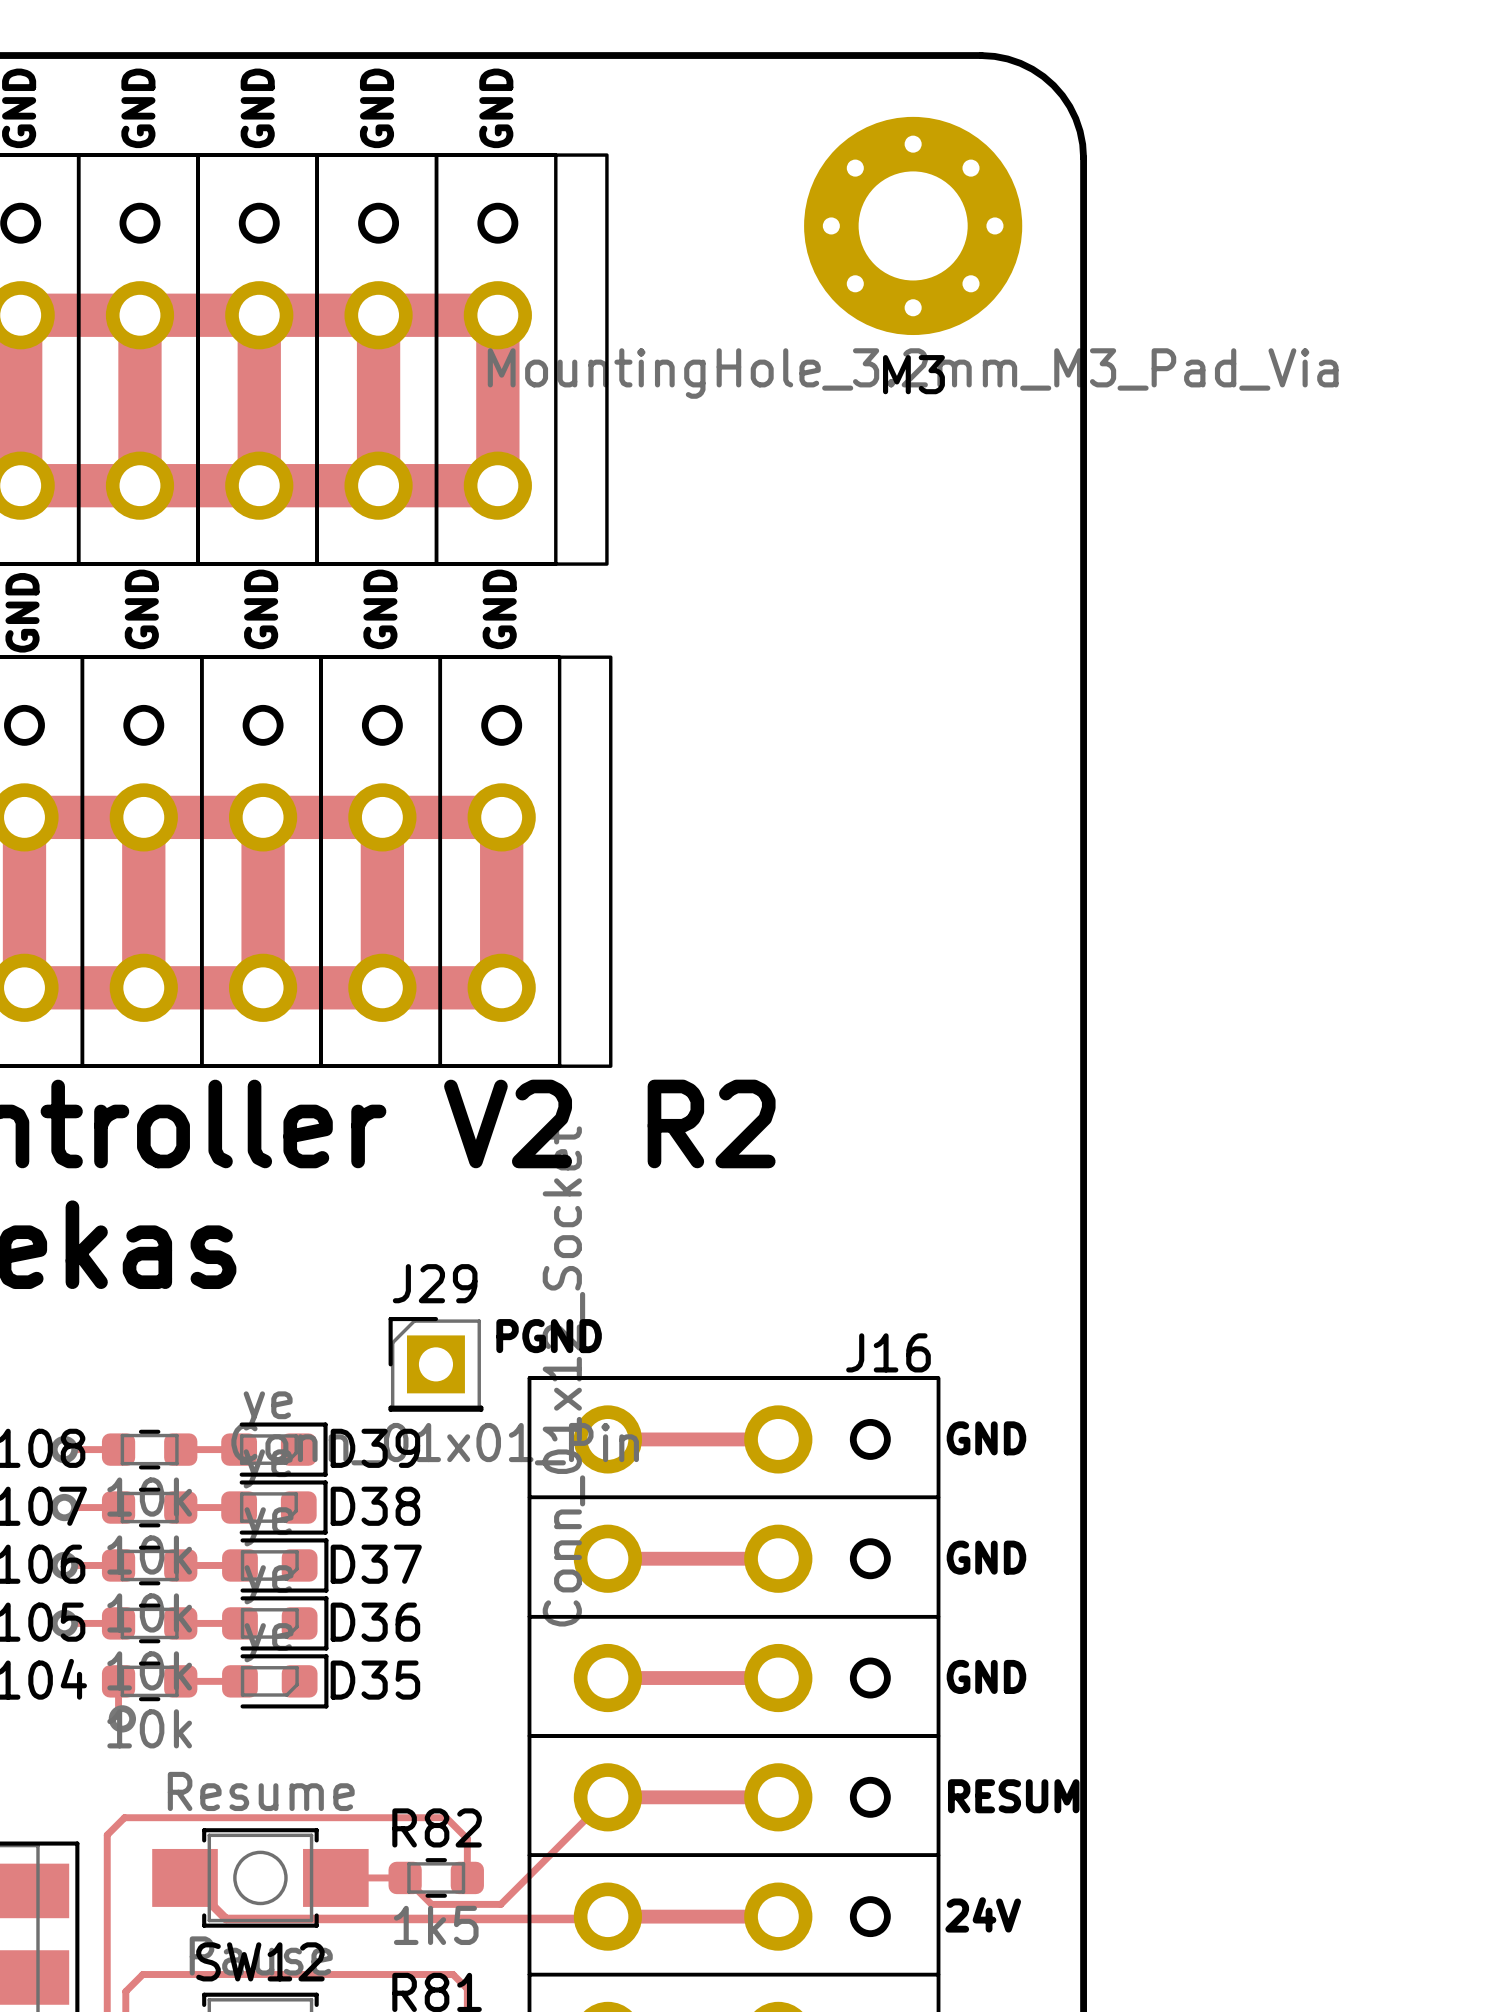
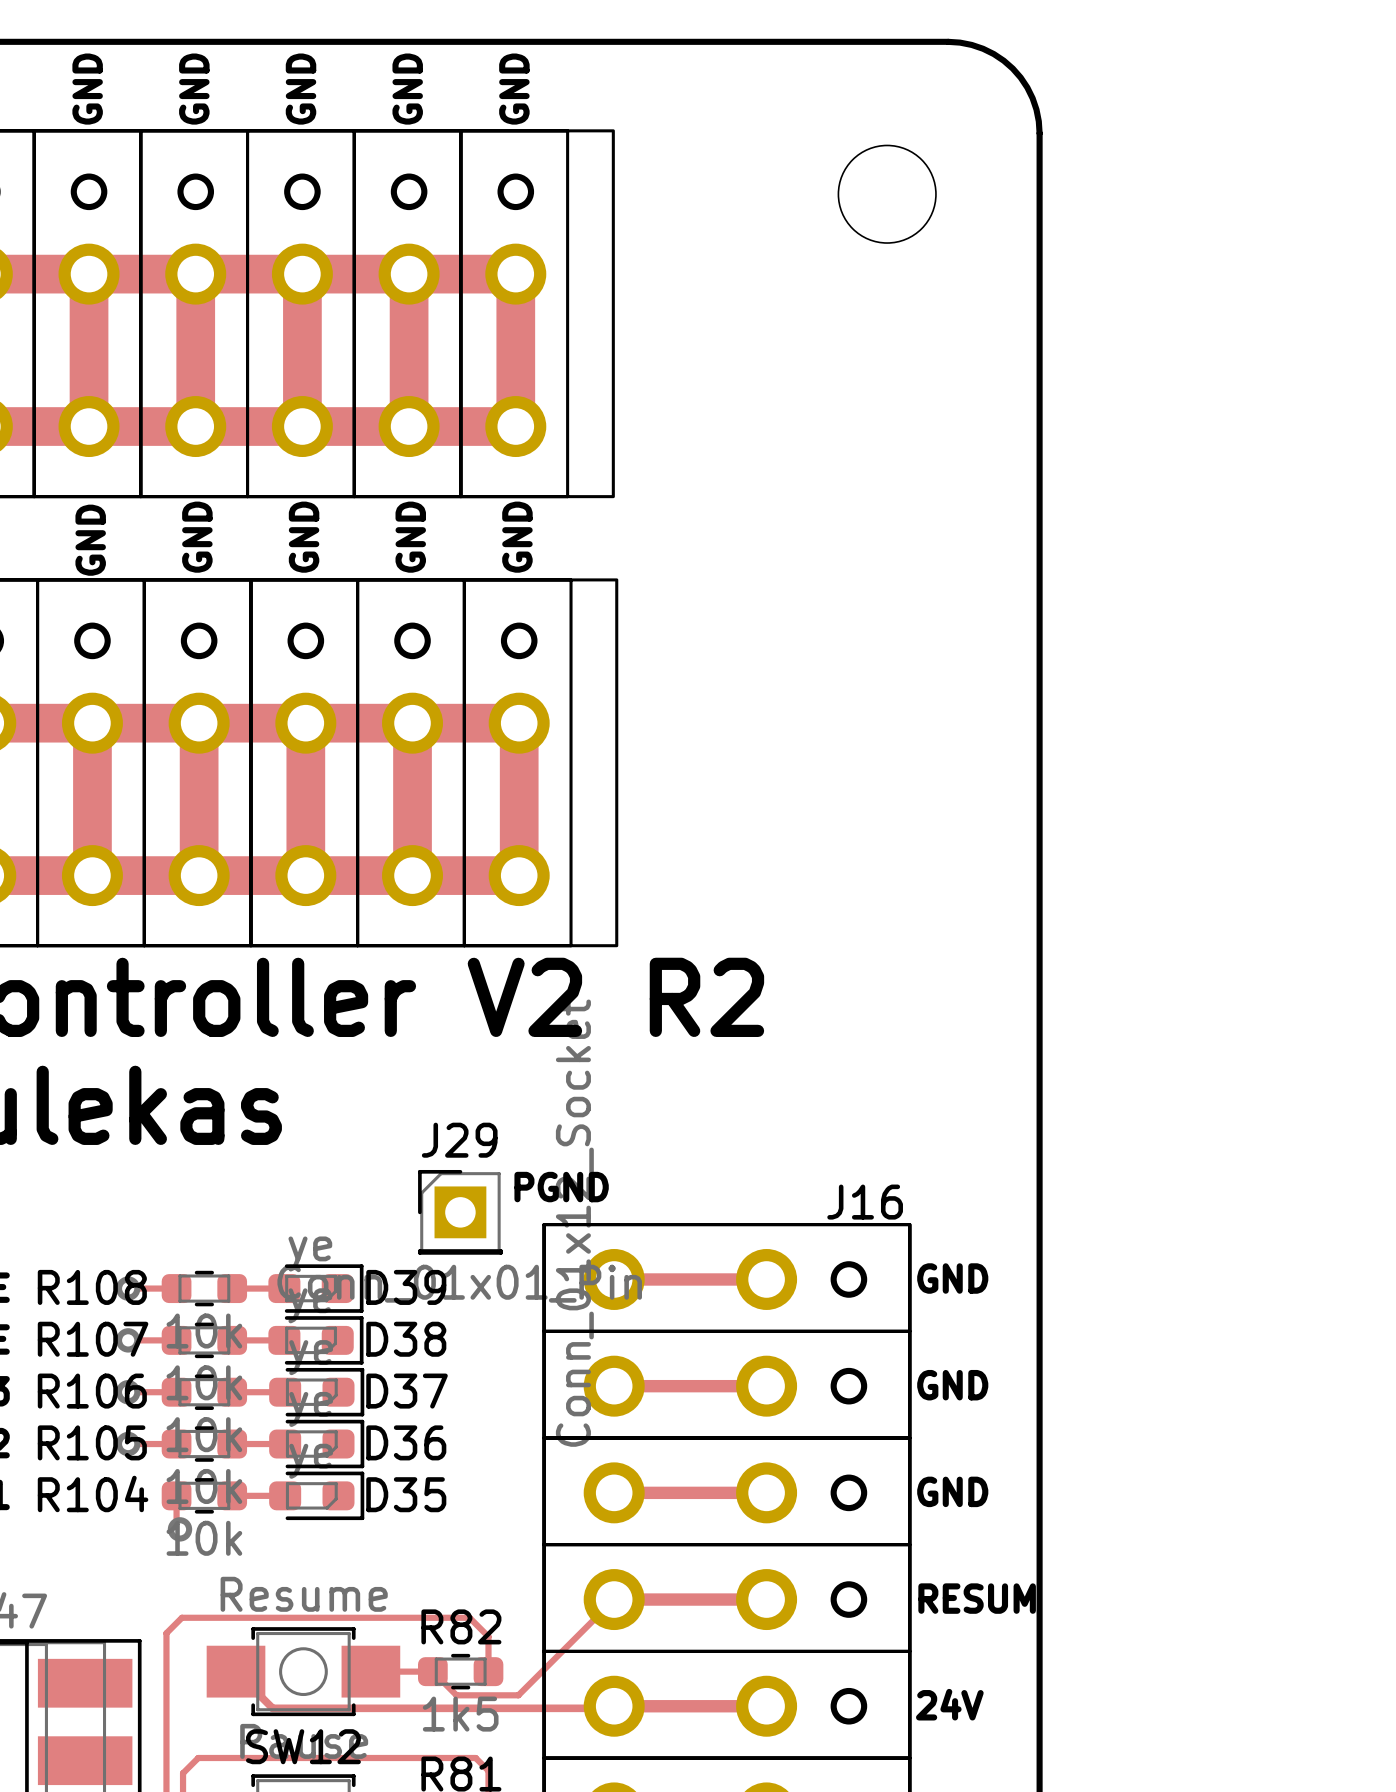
round board edge: none -> [837, 144, 937, 244]
M3: MountingHole_3.2mm_M3_Pad_Via (913, 225) -> none

